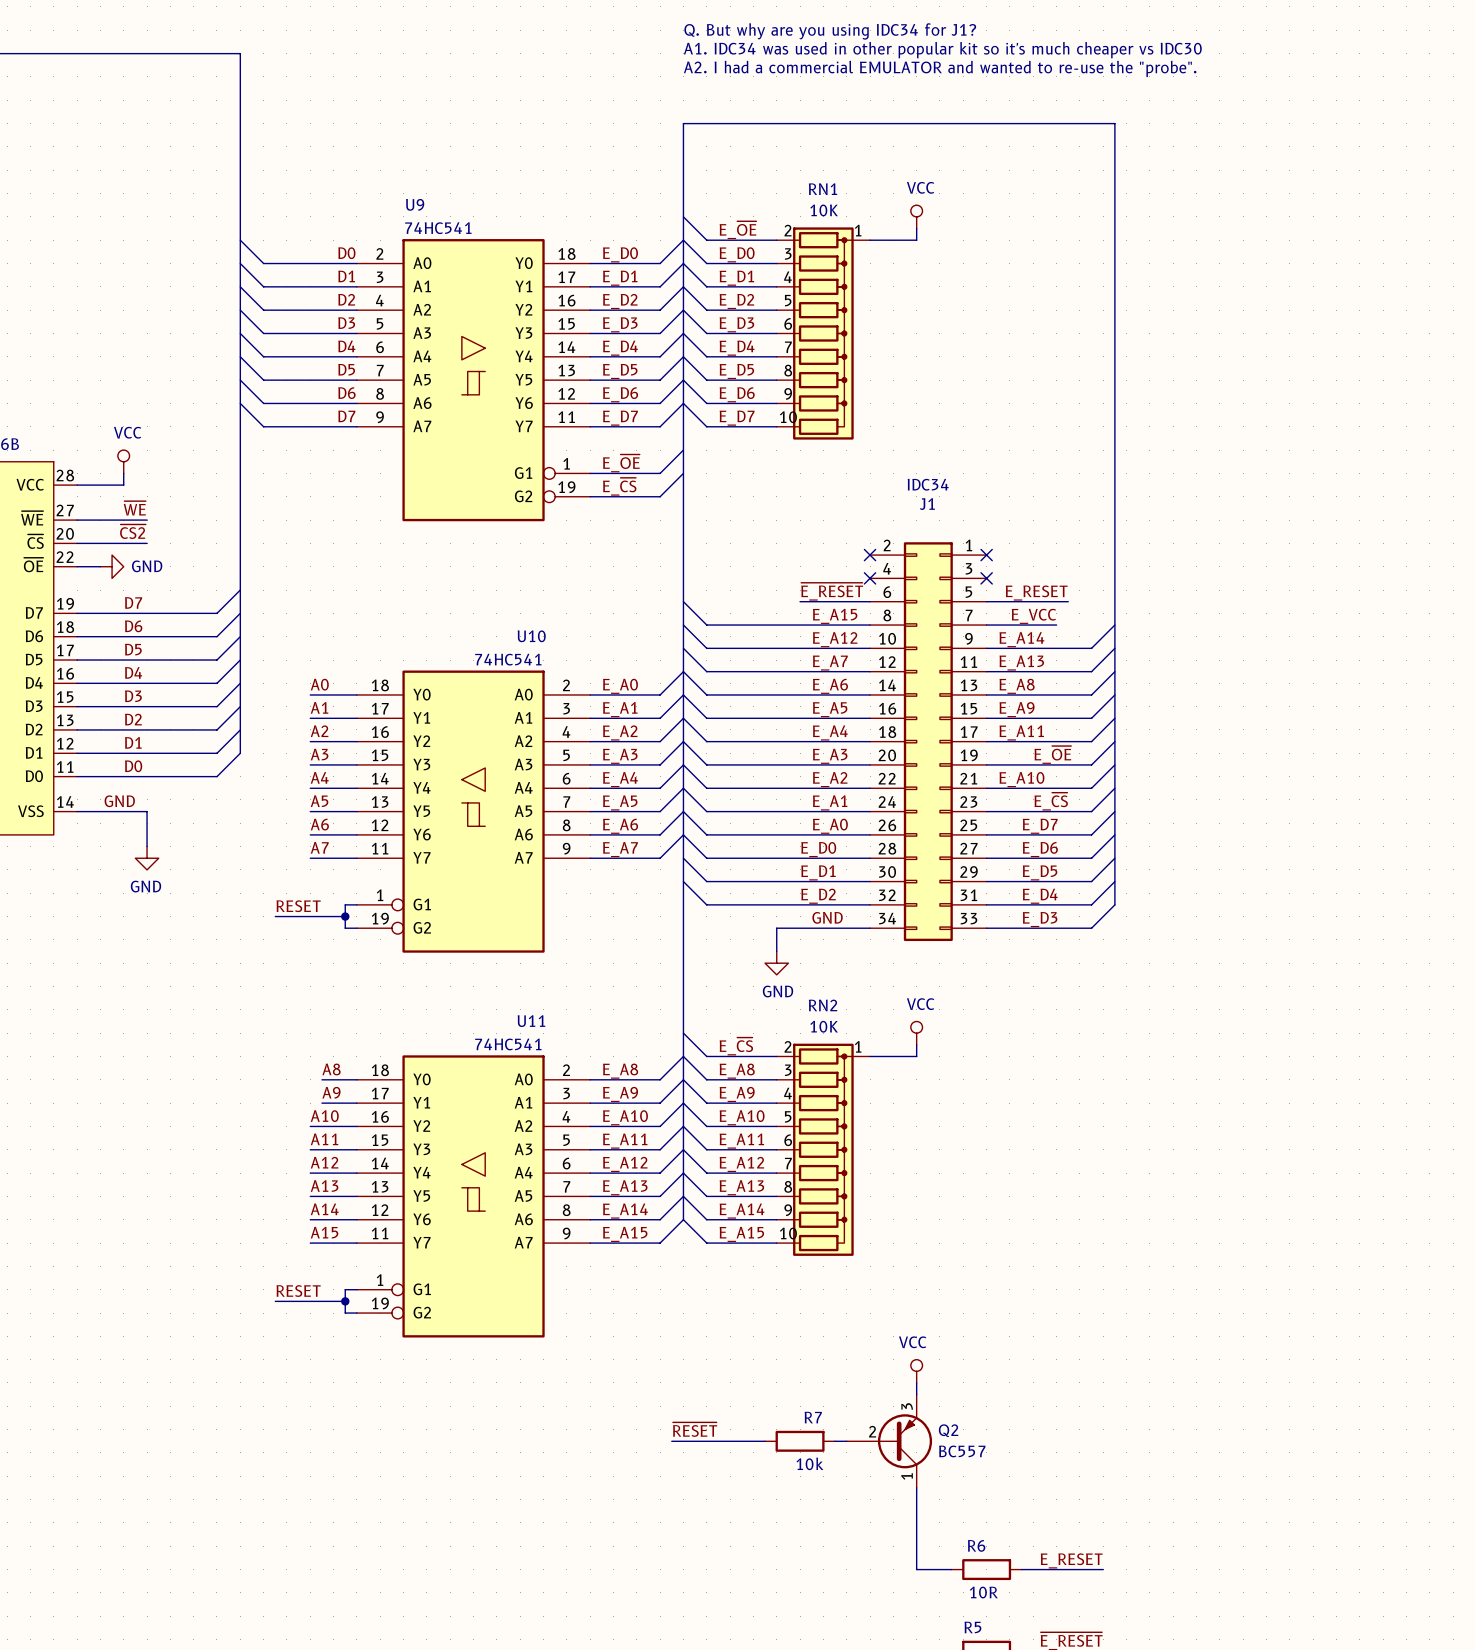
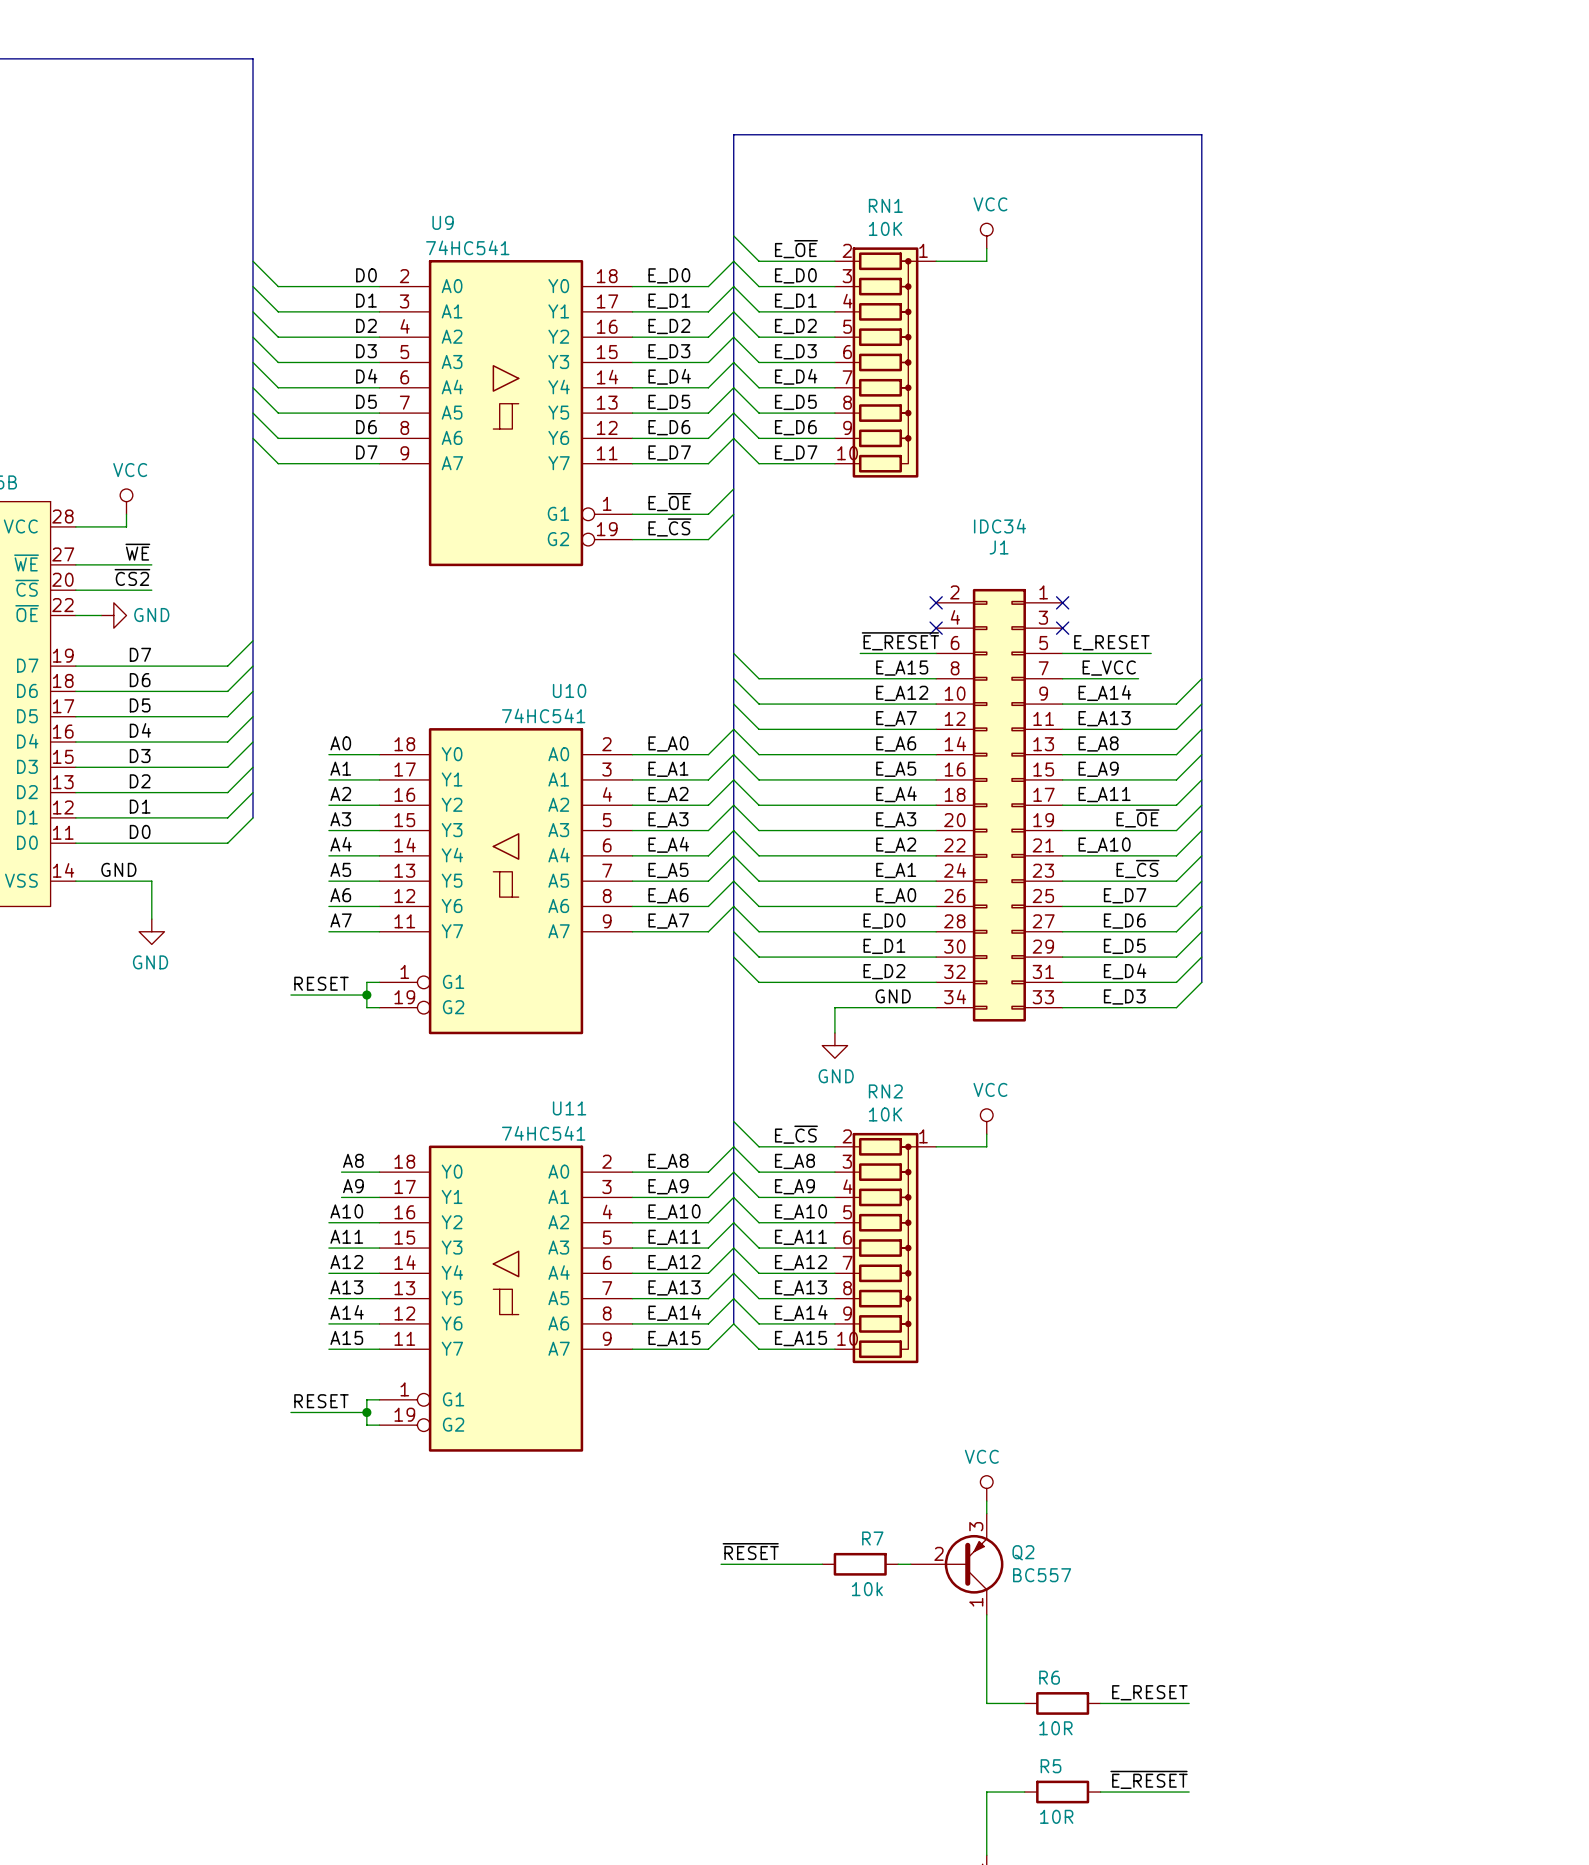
text: Q. But why are you using IDC34 for J1? (830, 31) -> none
text: A1. IDC34 was used in other popular kit so it's much cheaper vs IDC30 (942, 50) -> none
text: A2. I had a commercial EMULATOR and wanted to re-use the "probe". (940, 68) -> none

